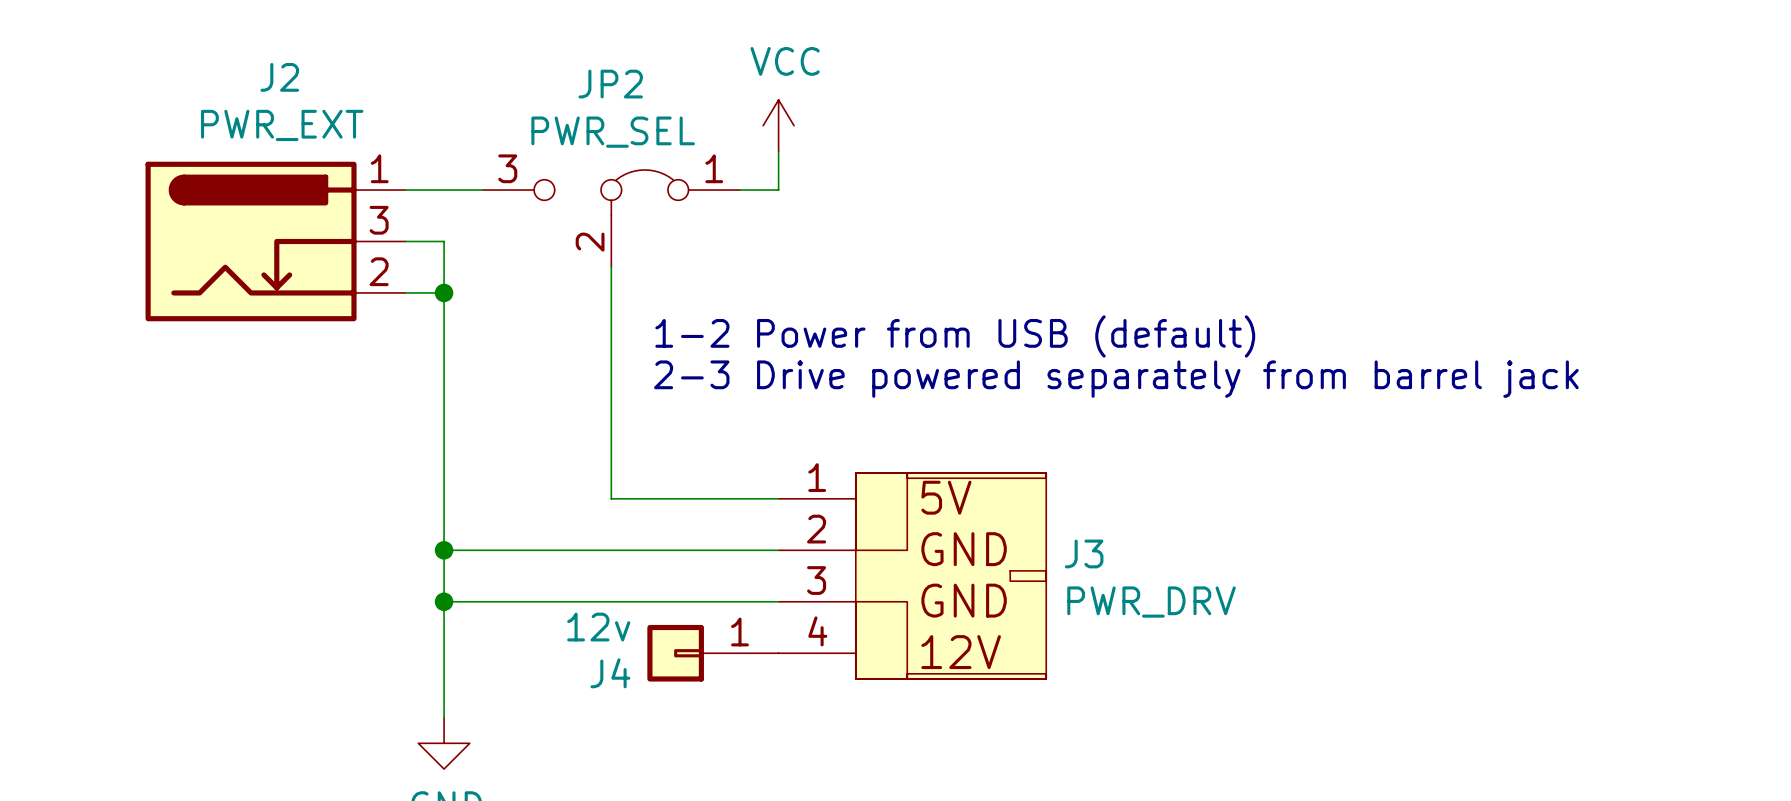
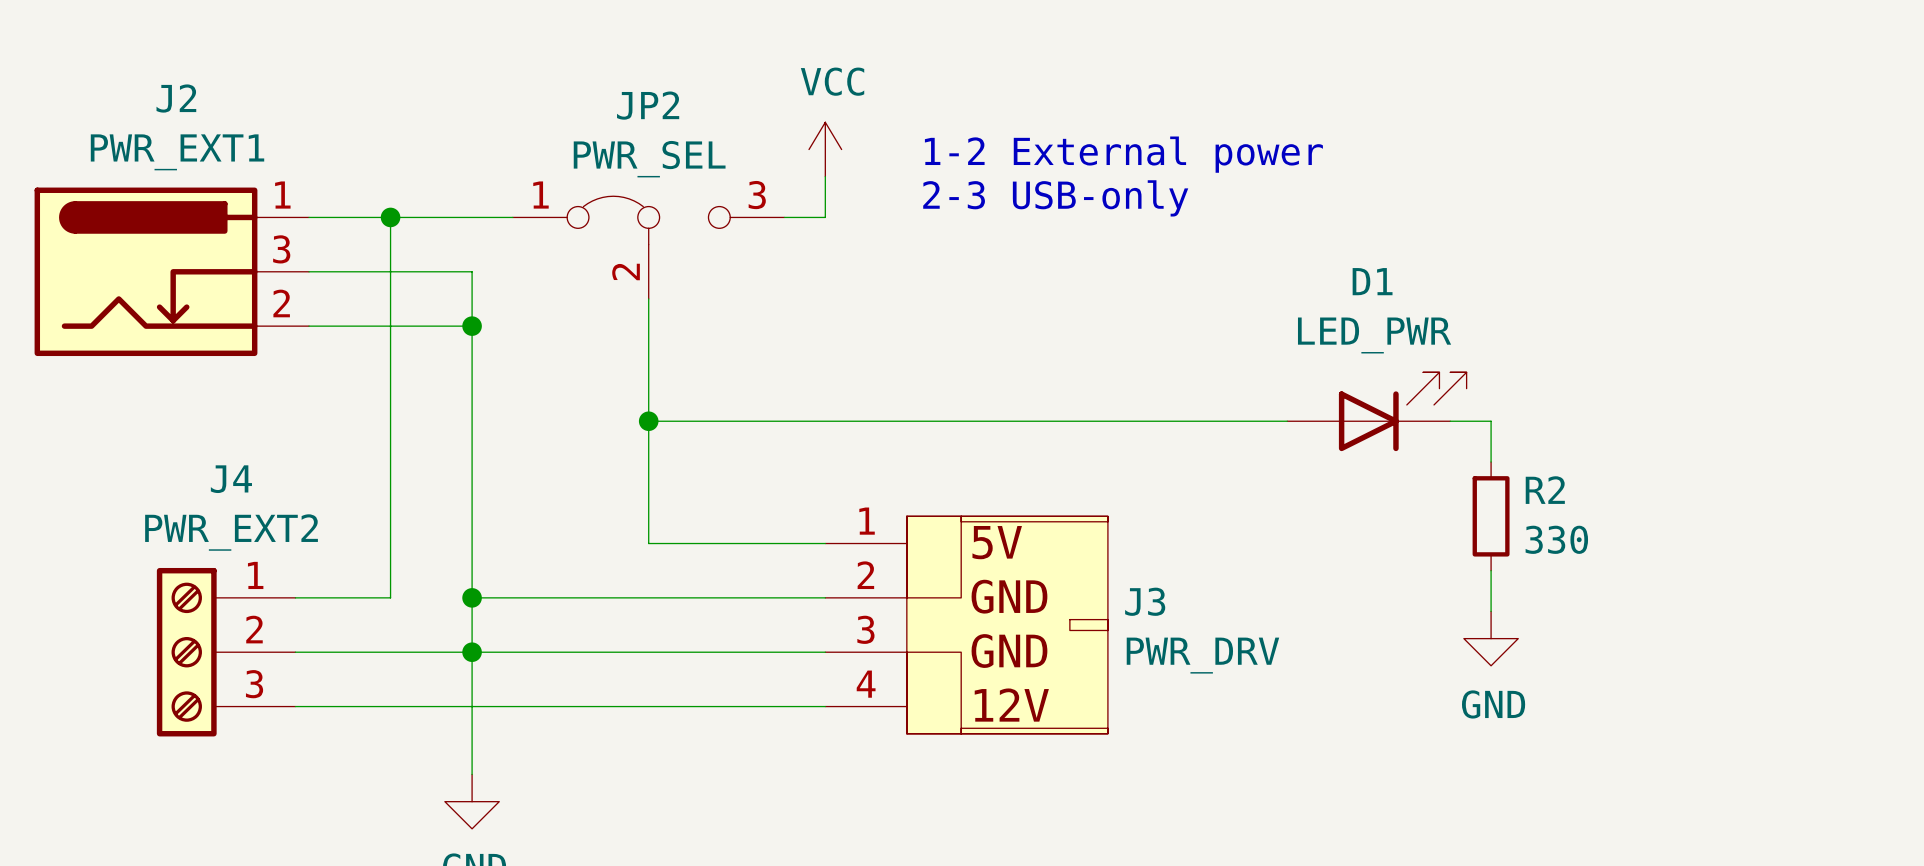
J2 value: PWR_EXT (282, 125) -> PWR_EXT1 (177, 152)
text: none -> 1-2 External power (1123, 154)
text: none -> 2-3 USB-only (1055, 198)
wire: none -> (390, 217) (390, 597) (295, 597)
junction: none -> (390, 217)
JP2 flip: as is (611, 192) -> left-right (648, 220)
J2 position: (275, 241) -> (171, 271)
text: 1-2 Power from USB (default) (955, 336) -> none
D1: none -> LED_PWR (1376, 411)
text: 2-3 Drive powered separately from barrel jack (1116, 379) -> none
wire: none -> (648, 421) (1287, 421)
junction: none -> (648, 421)
wire: none -> (1450, 421) (1491, 421) (1491, 462)
R2: none -> 330 (1491, 516)
wire: none -> (1491, 570) (1491, 611)
power symbol: none -> GND (1491, 638)
wire: none -> (295, 652) (472, 652)
J4 symbol: [647, 624, 779, 682] -> [156, 567, 296, 737]
J4 value: 12v (598, 627) -> PWR_EXT2 (231, 532)
wire: none -> (295, 706) (825, 706)
J4 name position: J4 (610, 673) -> J4 (231, 479)

